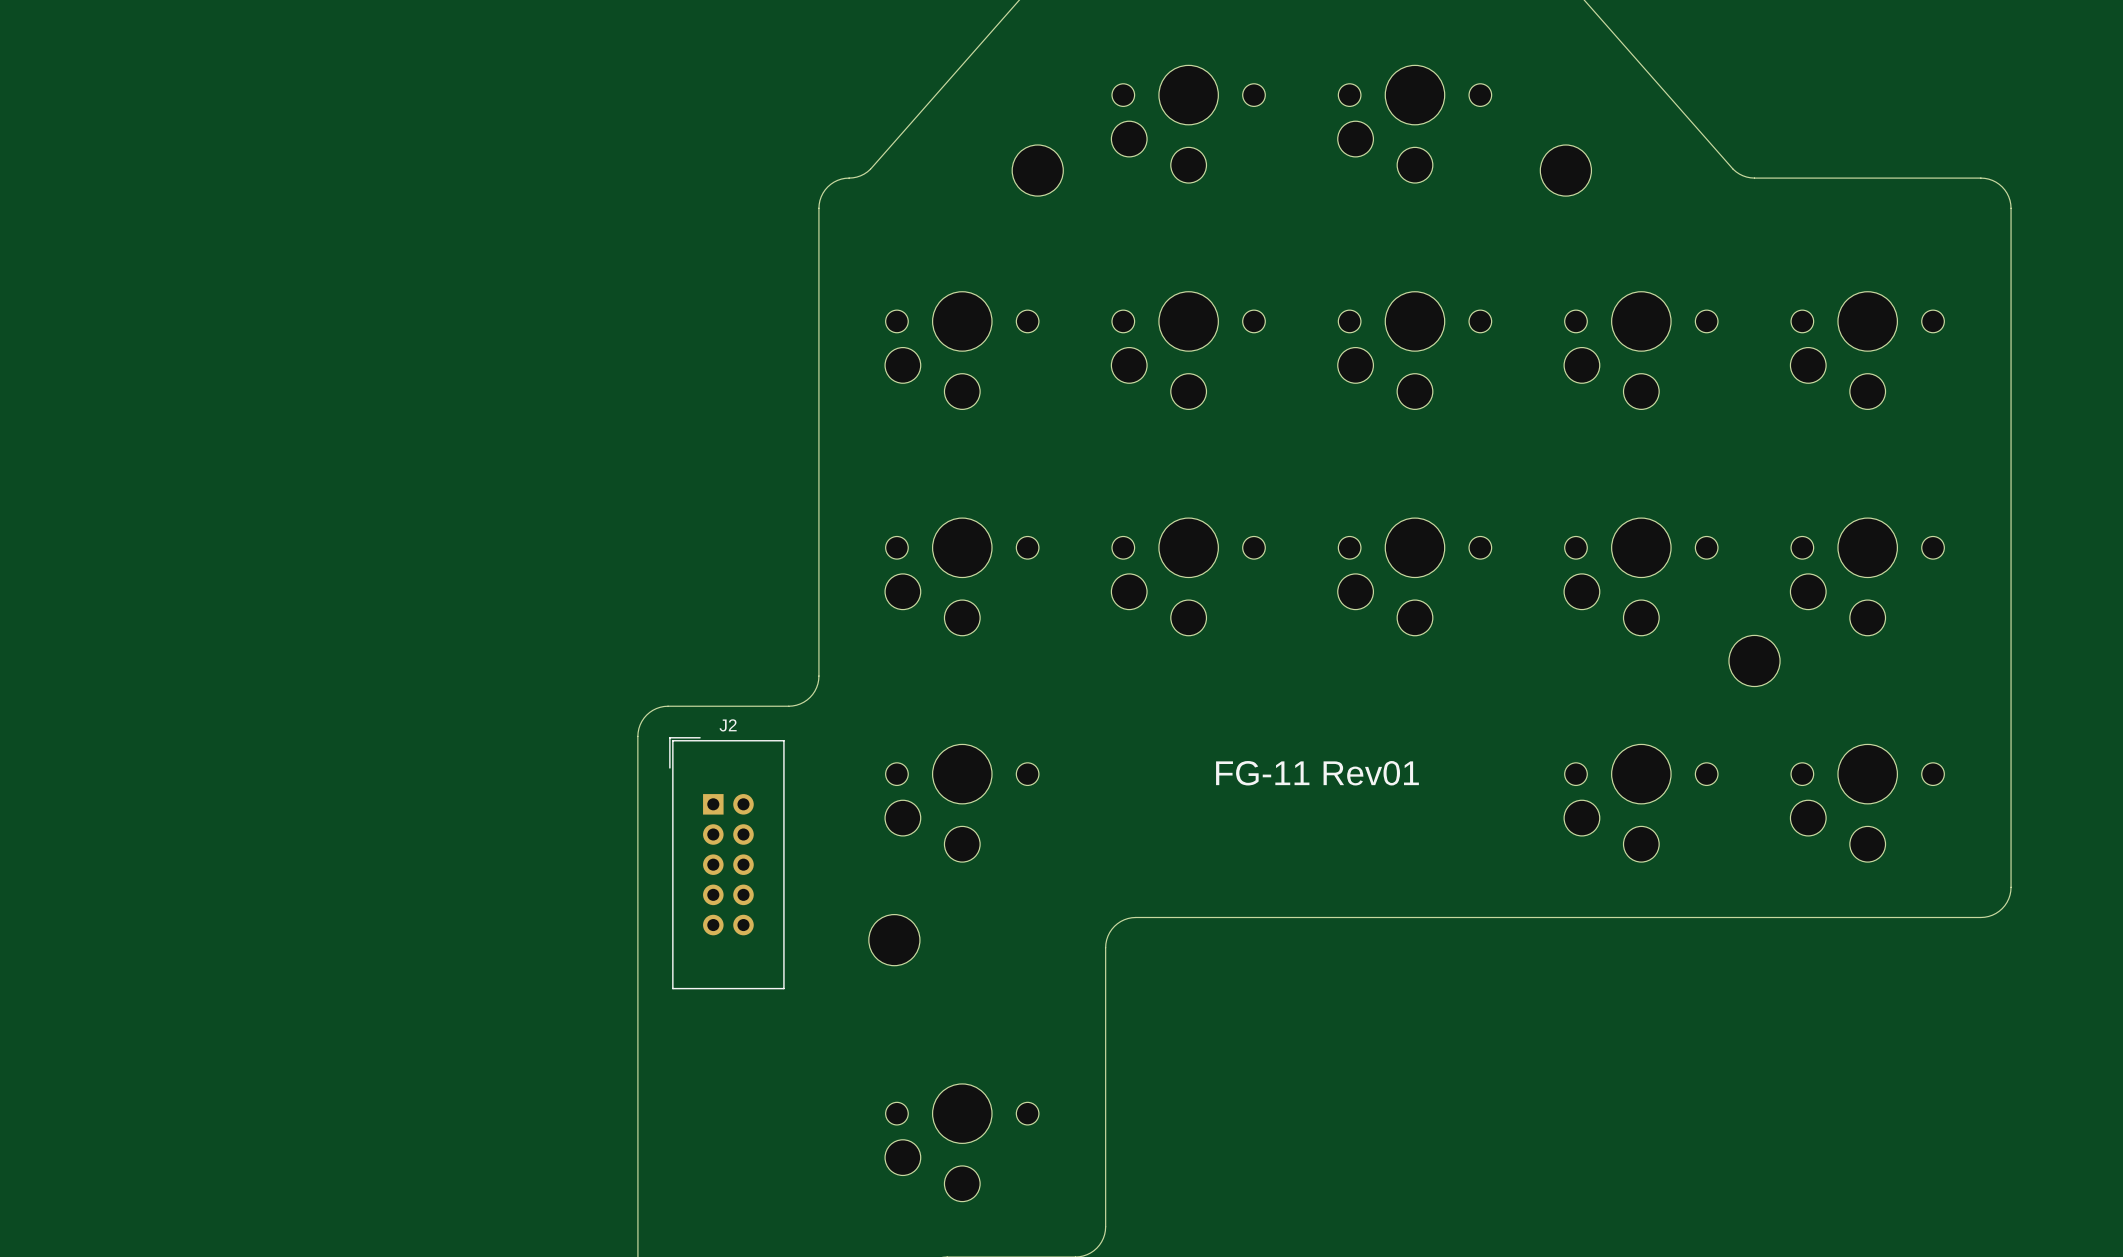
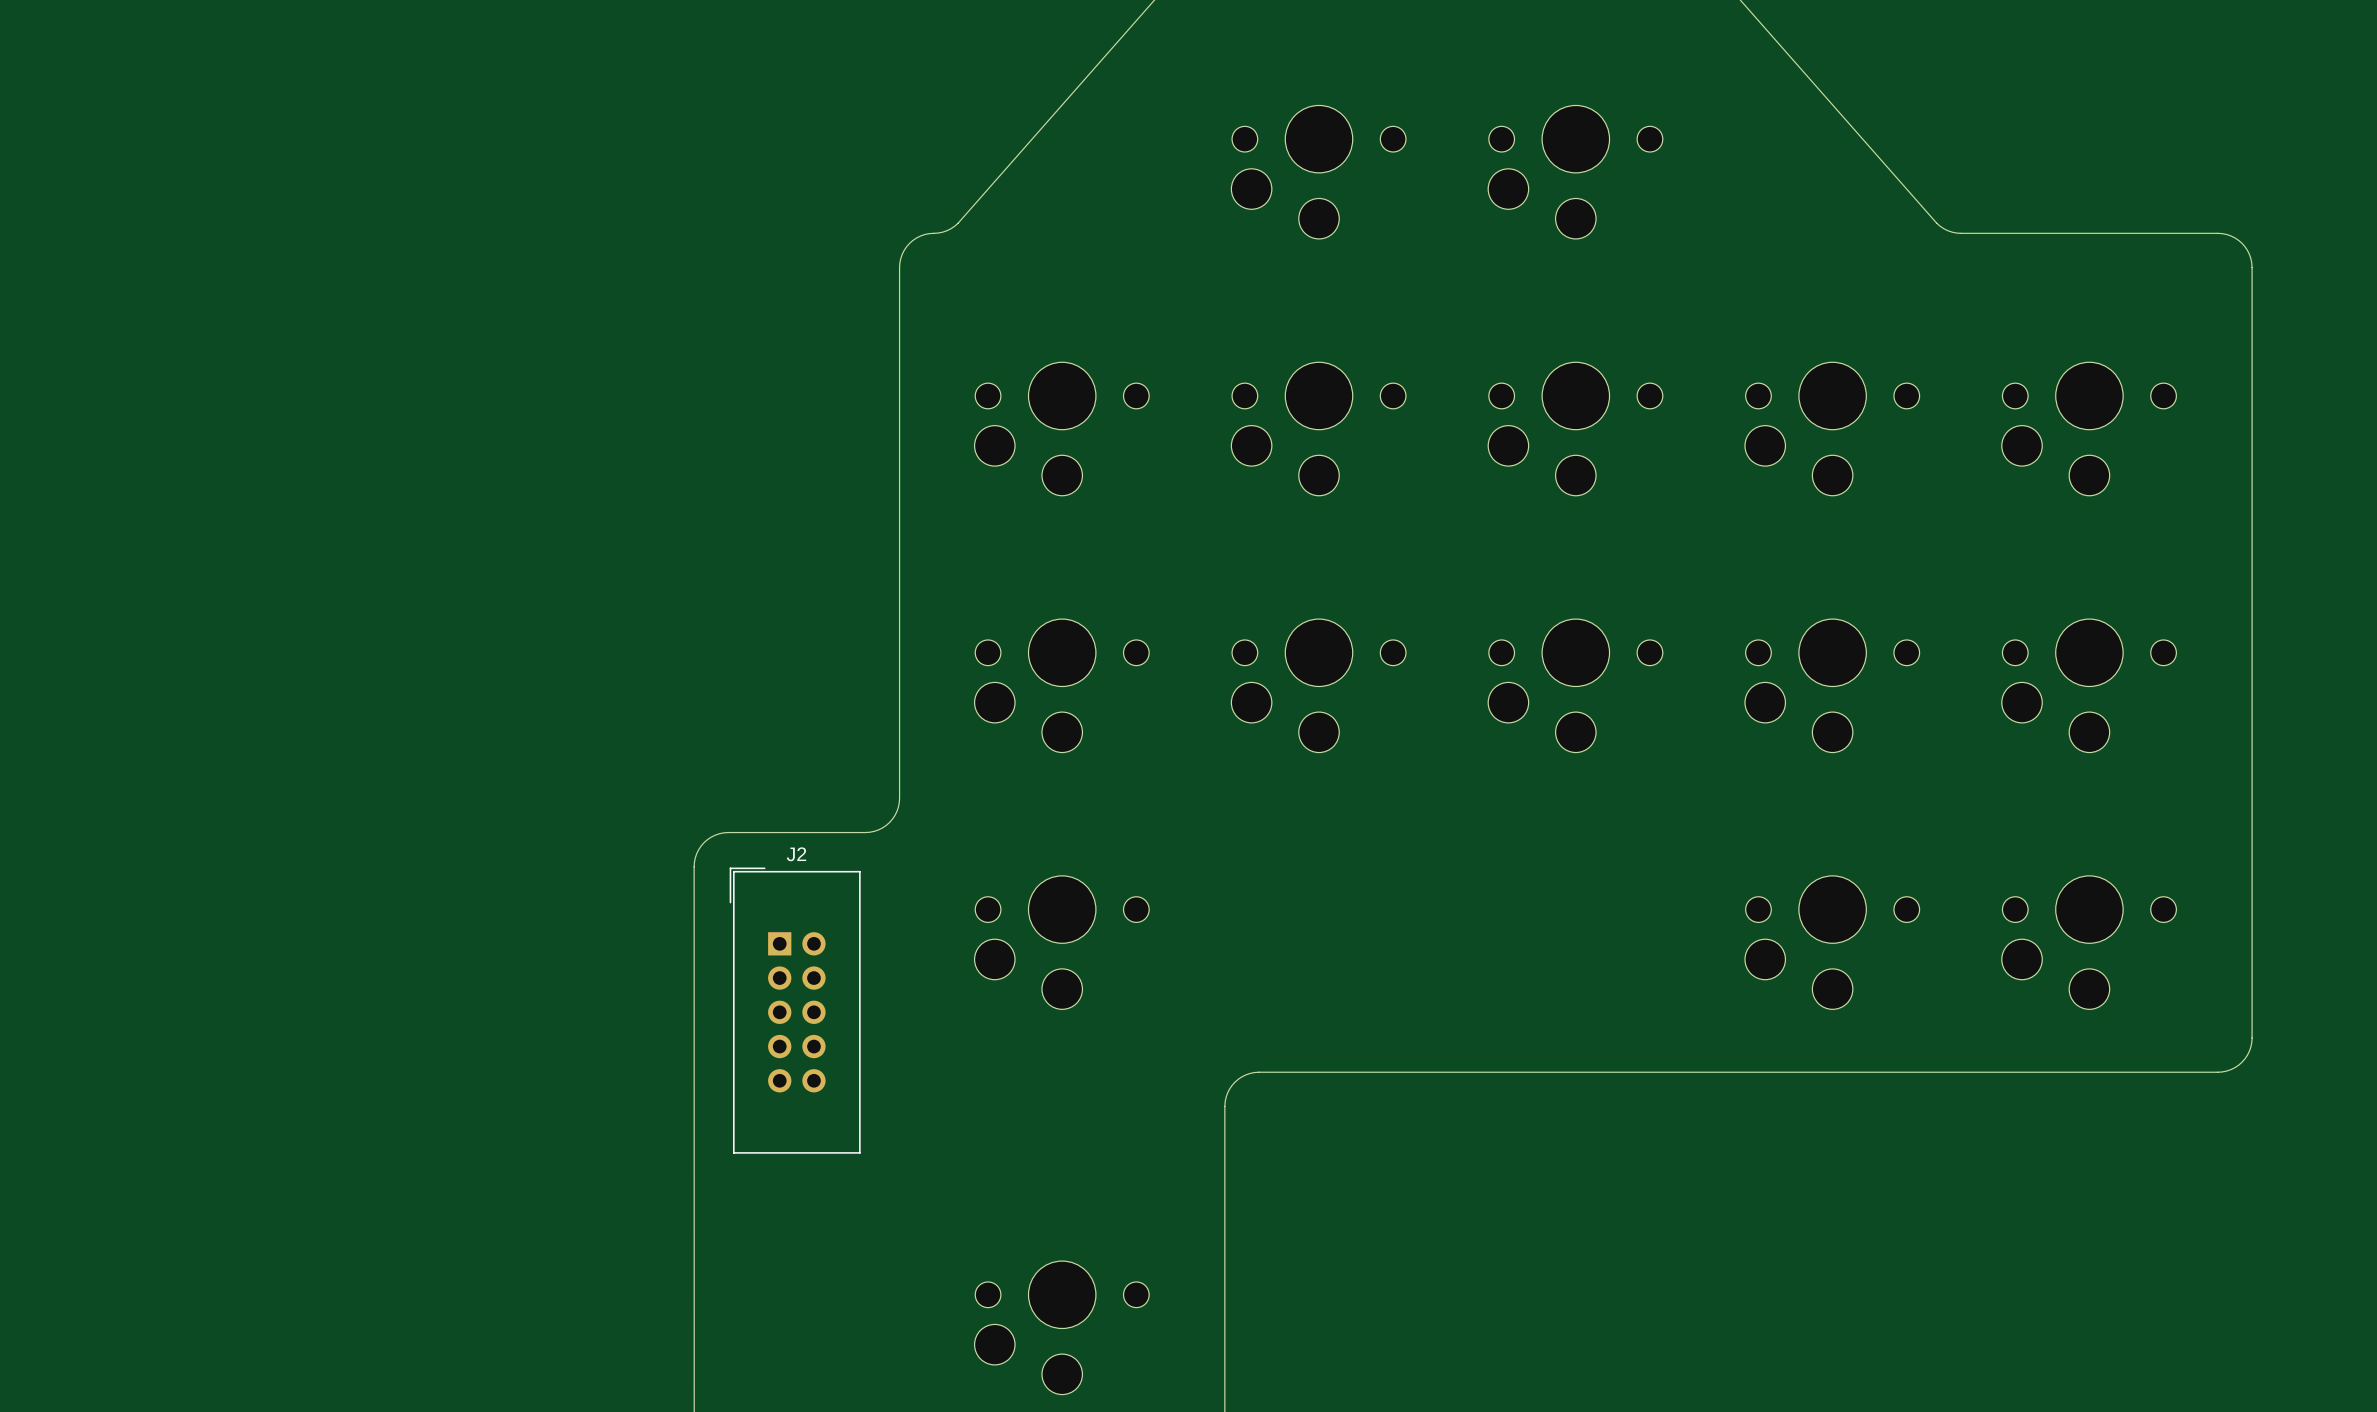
part: (1037, 170) -> none
part: (1565, 170) -> none
part: (1754, 660) -> none
text: FG-11 Rev01 (1317, 773) -> none
part: (894, 940) -> none

